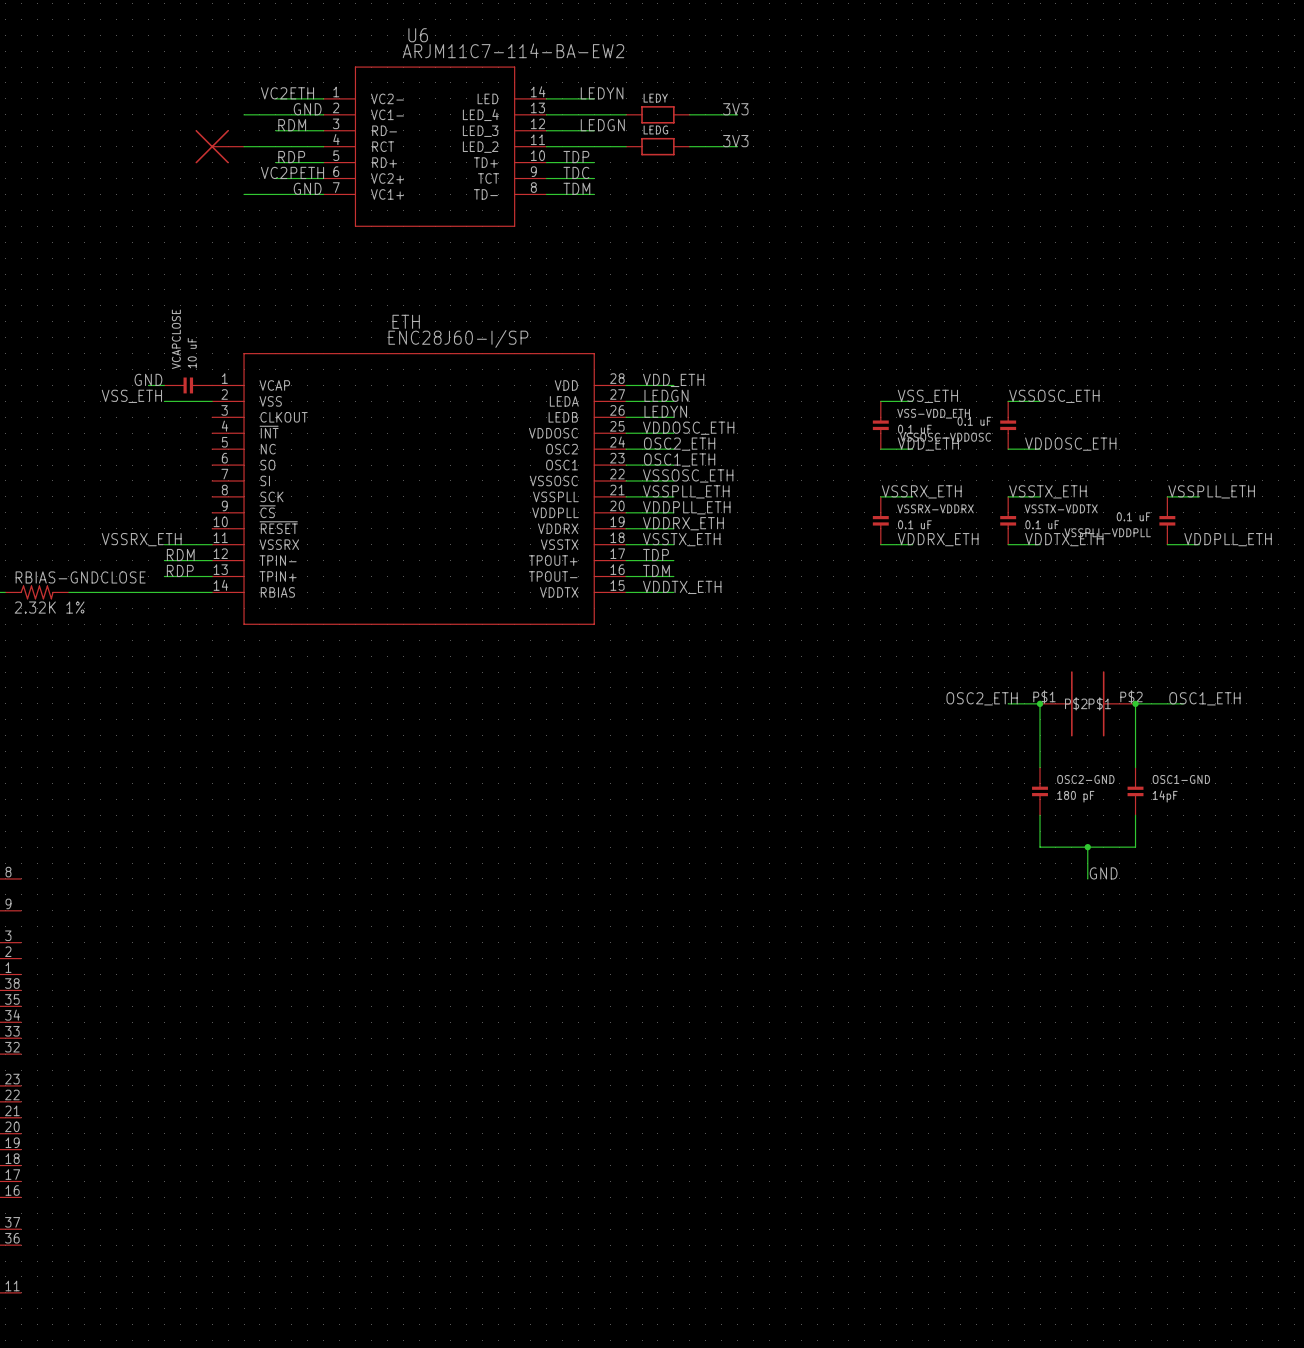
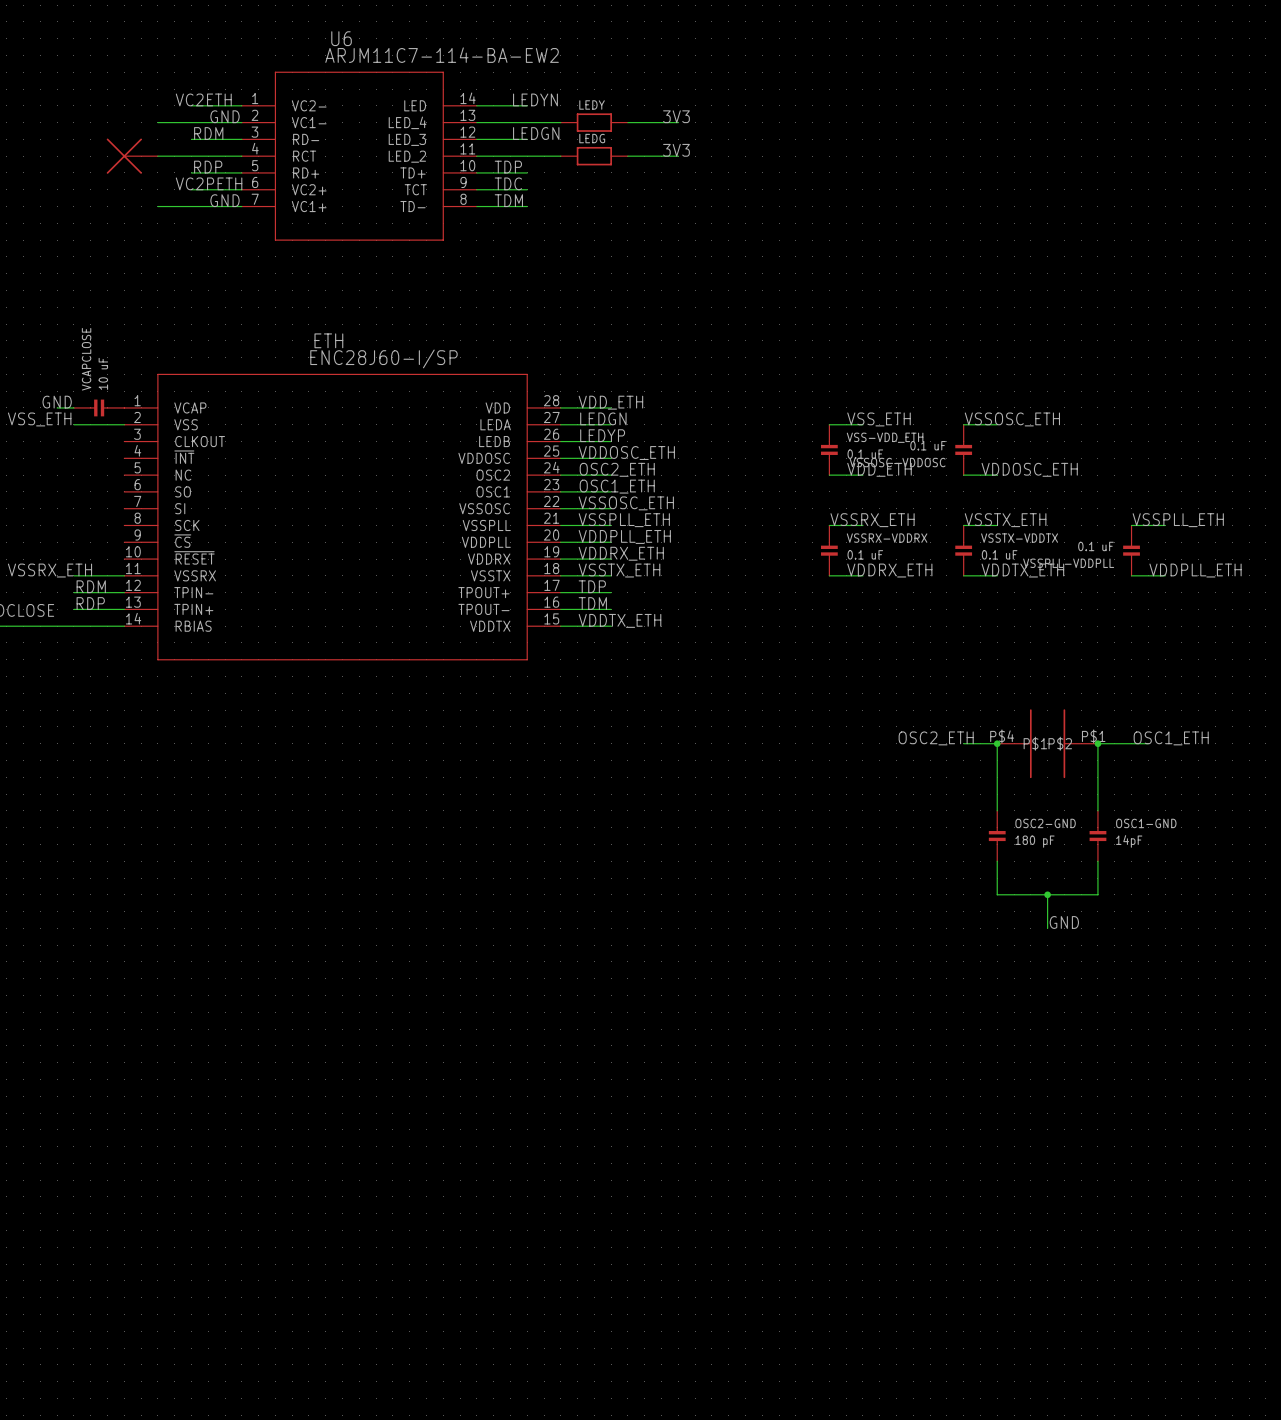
label: LEDYN (665, 411) -> LEDYP (602, 435)
part pin number: P$1 (1044, 696) -> P$4 (1002, 736)
part pin number: P$2 (1131, 696) -> P$1 (1093, 736)
part pin name: P$2 (1076, 703) -> P$1 (1035, 743)
part pin name: P$1 (1099, 703) -> P$2 (1060, 743)

